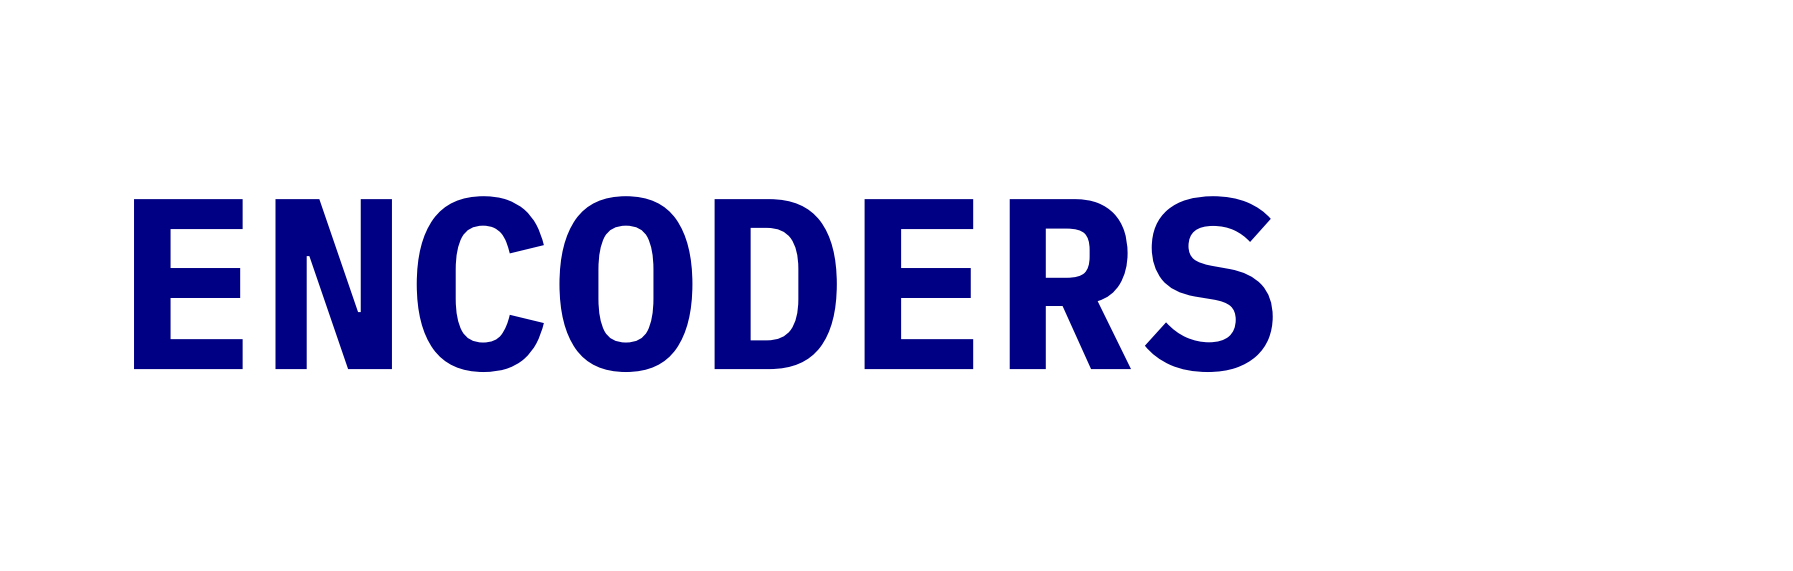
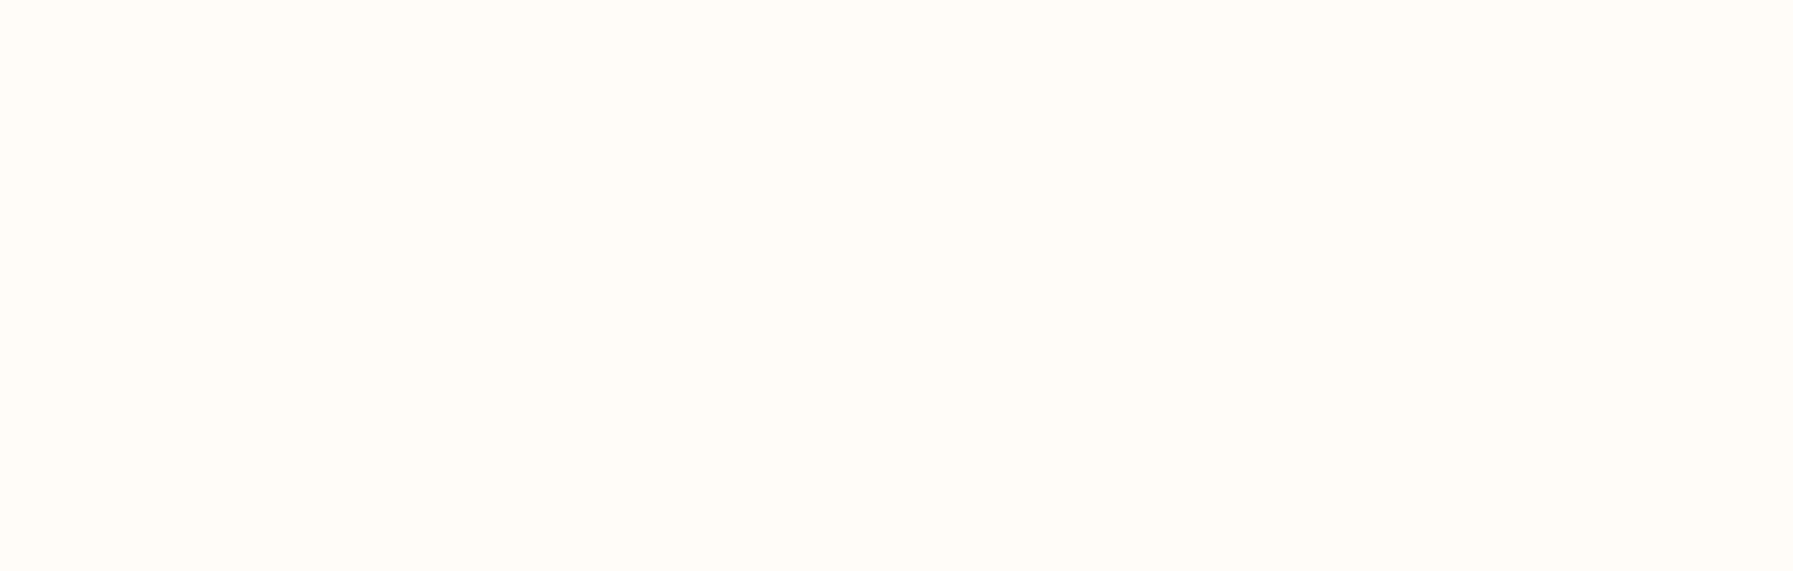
text: ENCODERS (703, 284) -> none

